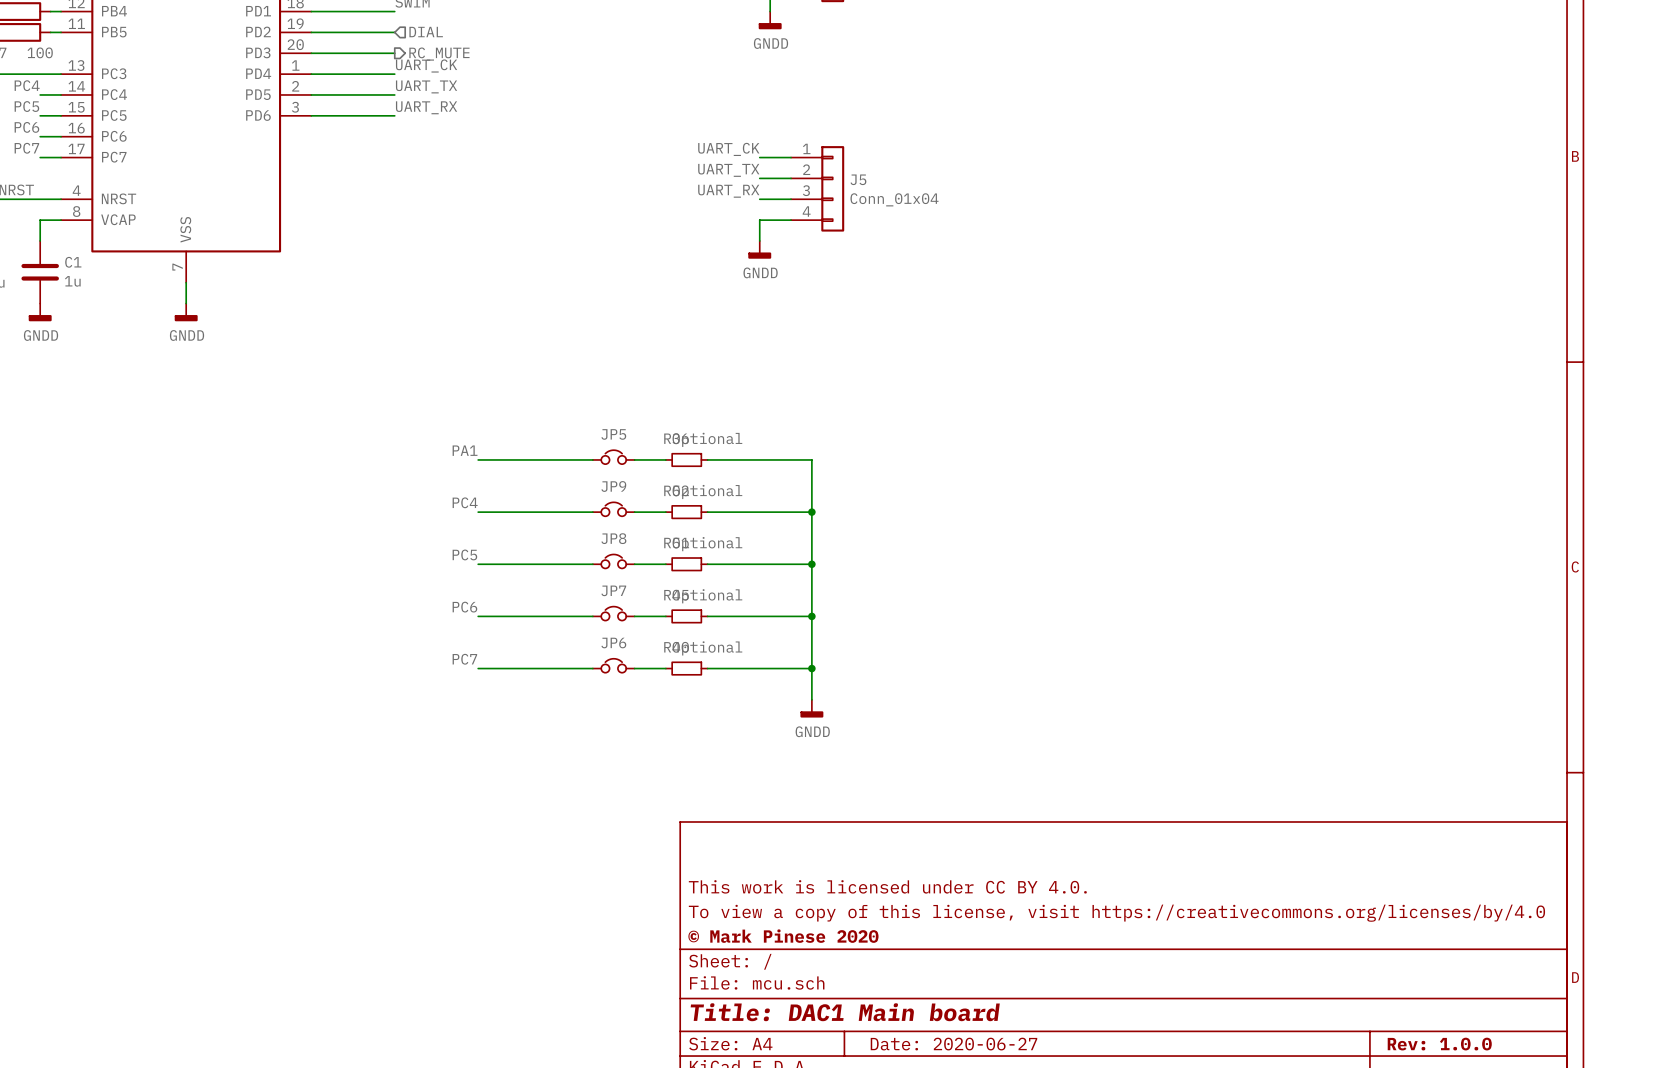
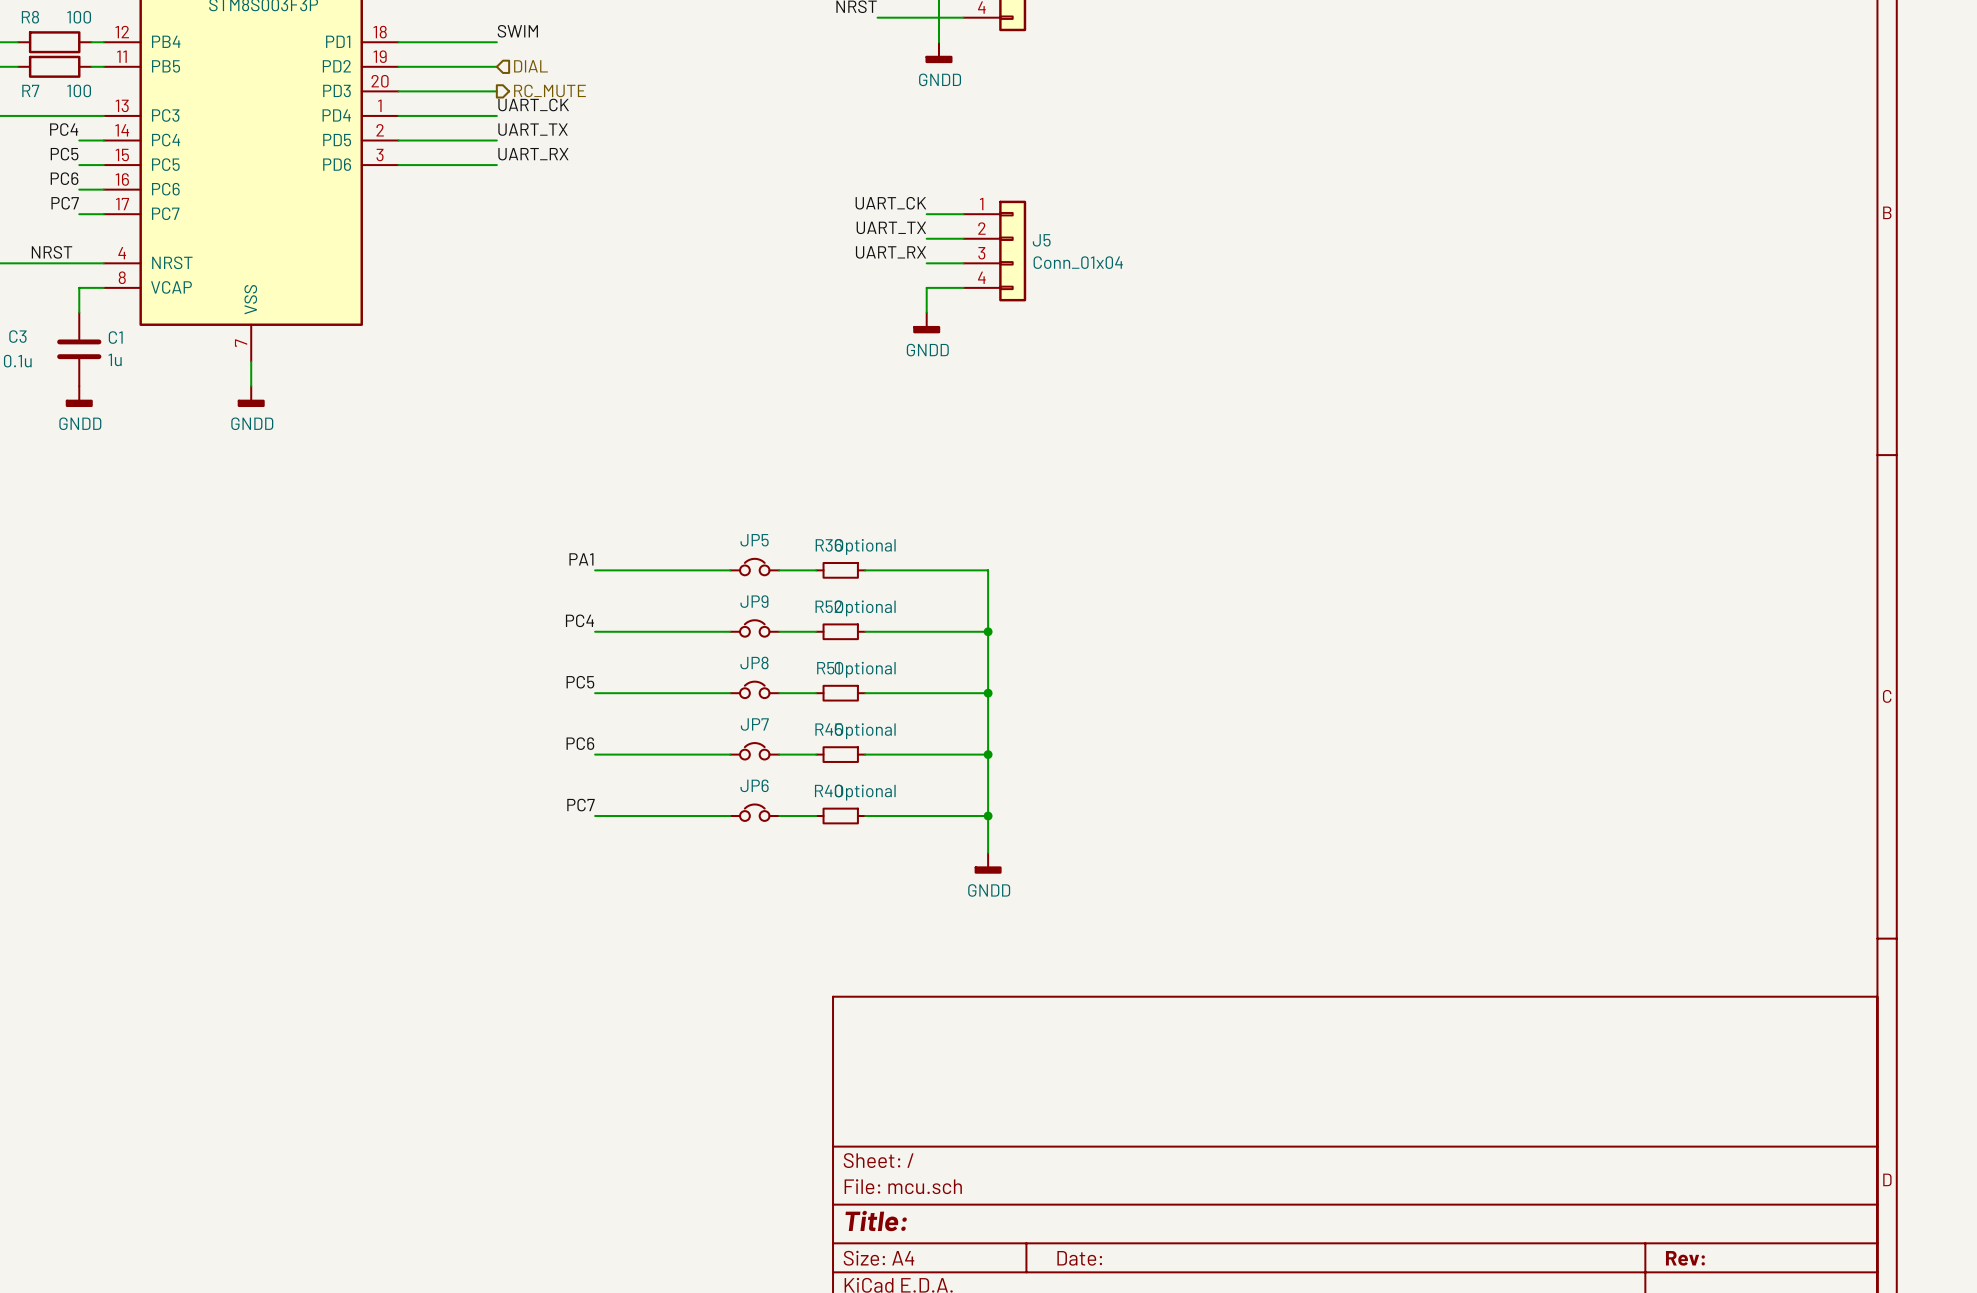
title block: This work is licensed under CC BY 4.0. (887, 886) -> none
title block: To view a copy of this license, visit https://creativecommons.org/licenses/by/4.0 (1116, 913) -> none
title block: © Mark Pinese 2020 (783, 936) -> none
title block: Title: DAC1 Main board (845, 1012) -> Title: (876, 1221)
title block: Date: 2020-06-27 (953, 1044) -> Date: (1079, 1258)
title block: Rev: 1.0.0 (1439, 1044) -> Rev: (1685, 1258)

